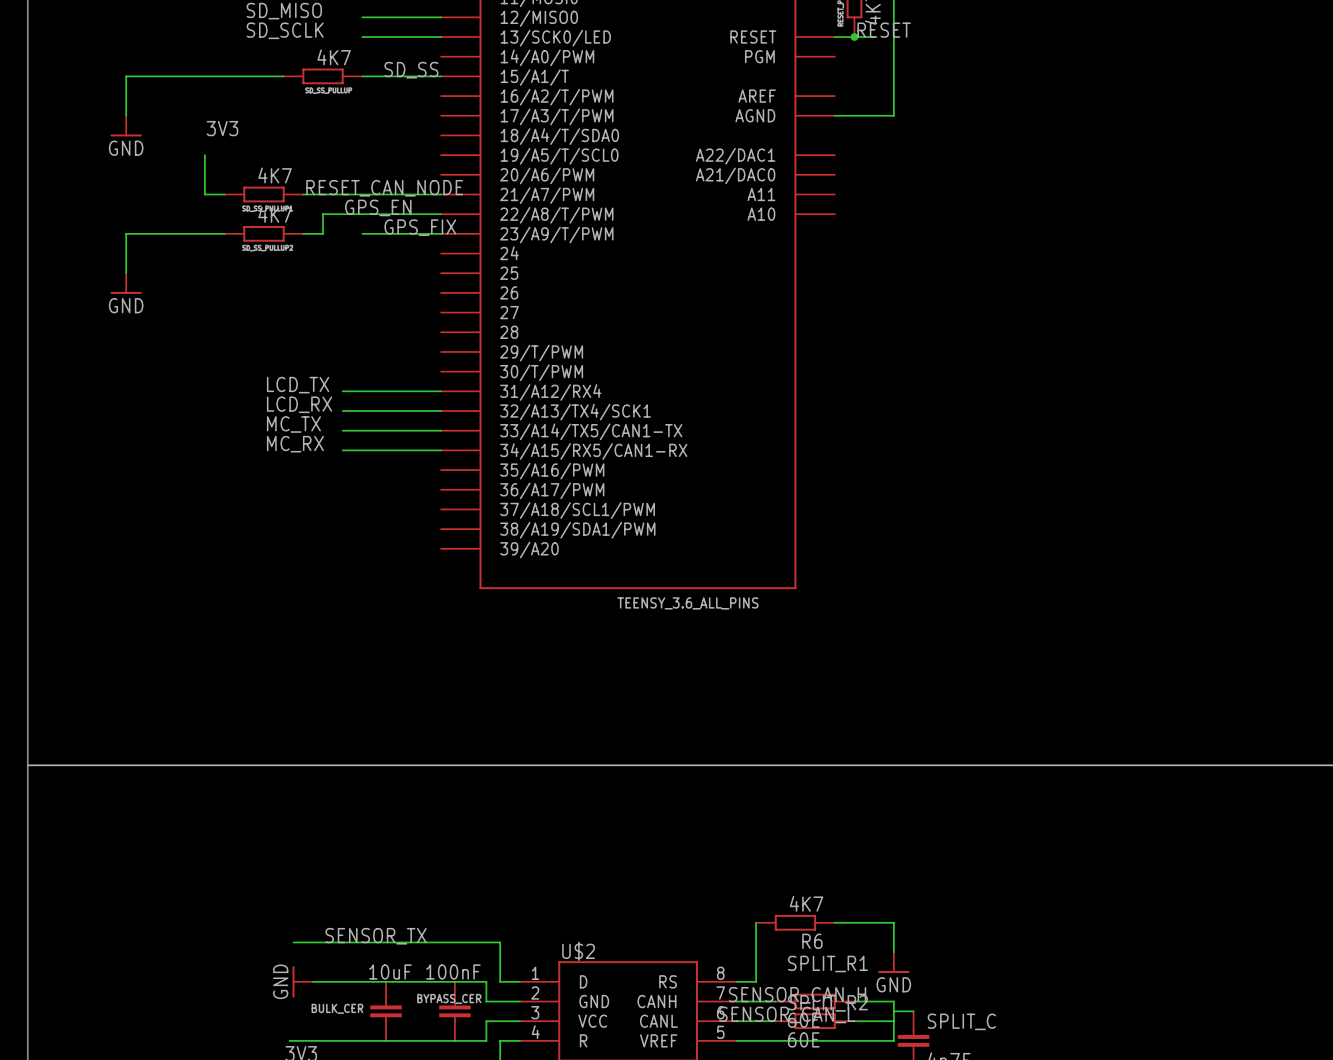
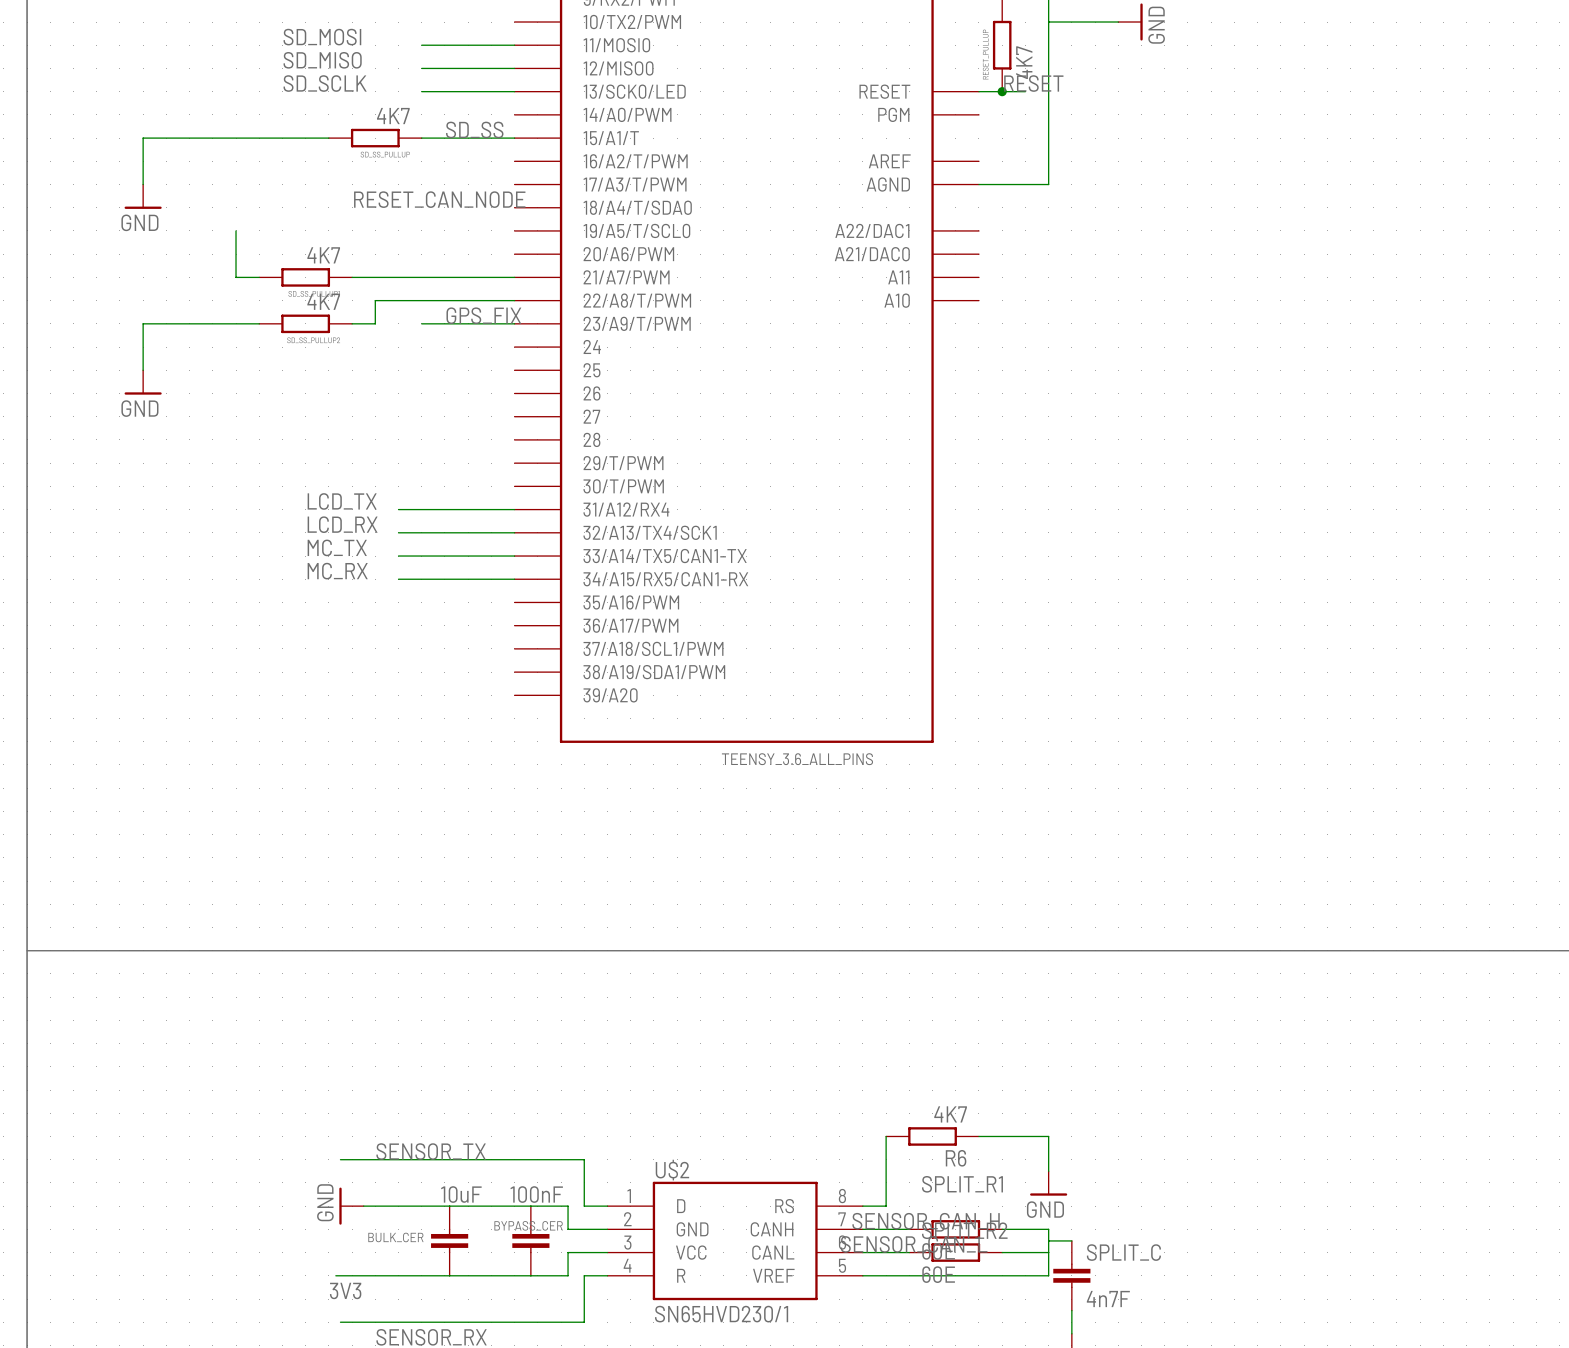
label: 3V3 (222, 128) -> none
label position: RESET_CAN_NODE (384, 188) -> RESET_CAN_NODE (439, 199)
label: GPS_EN (378, 207) -> none

